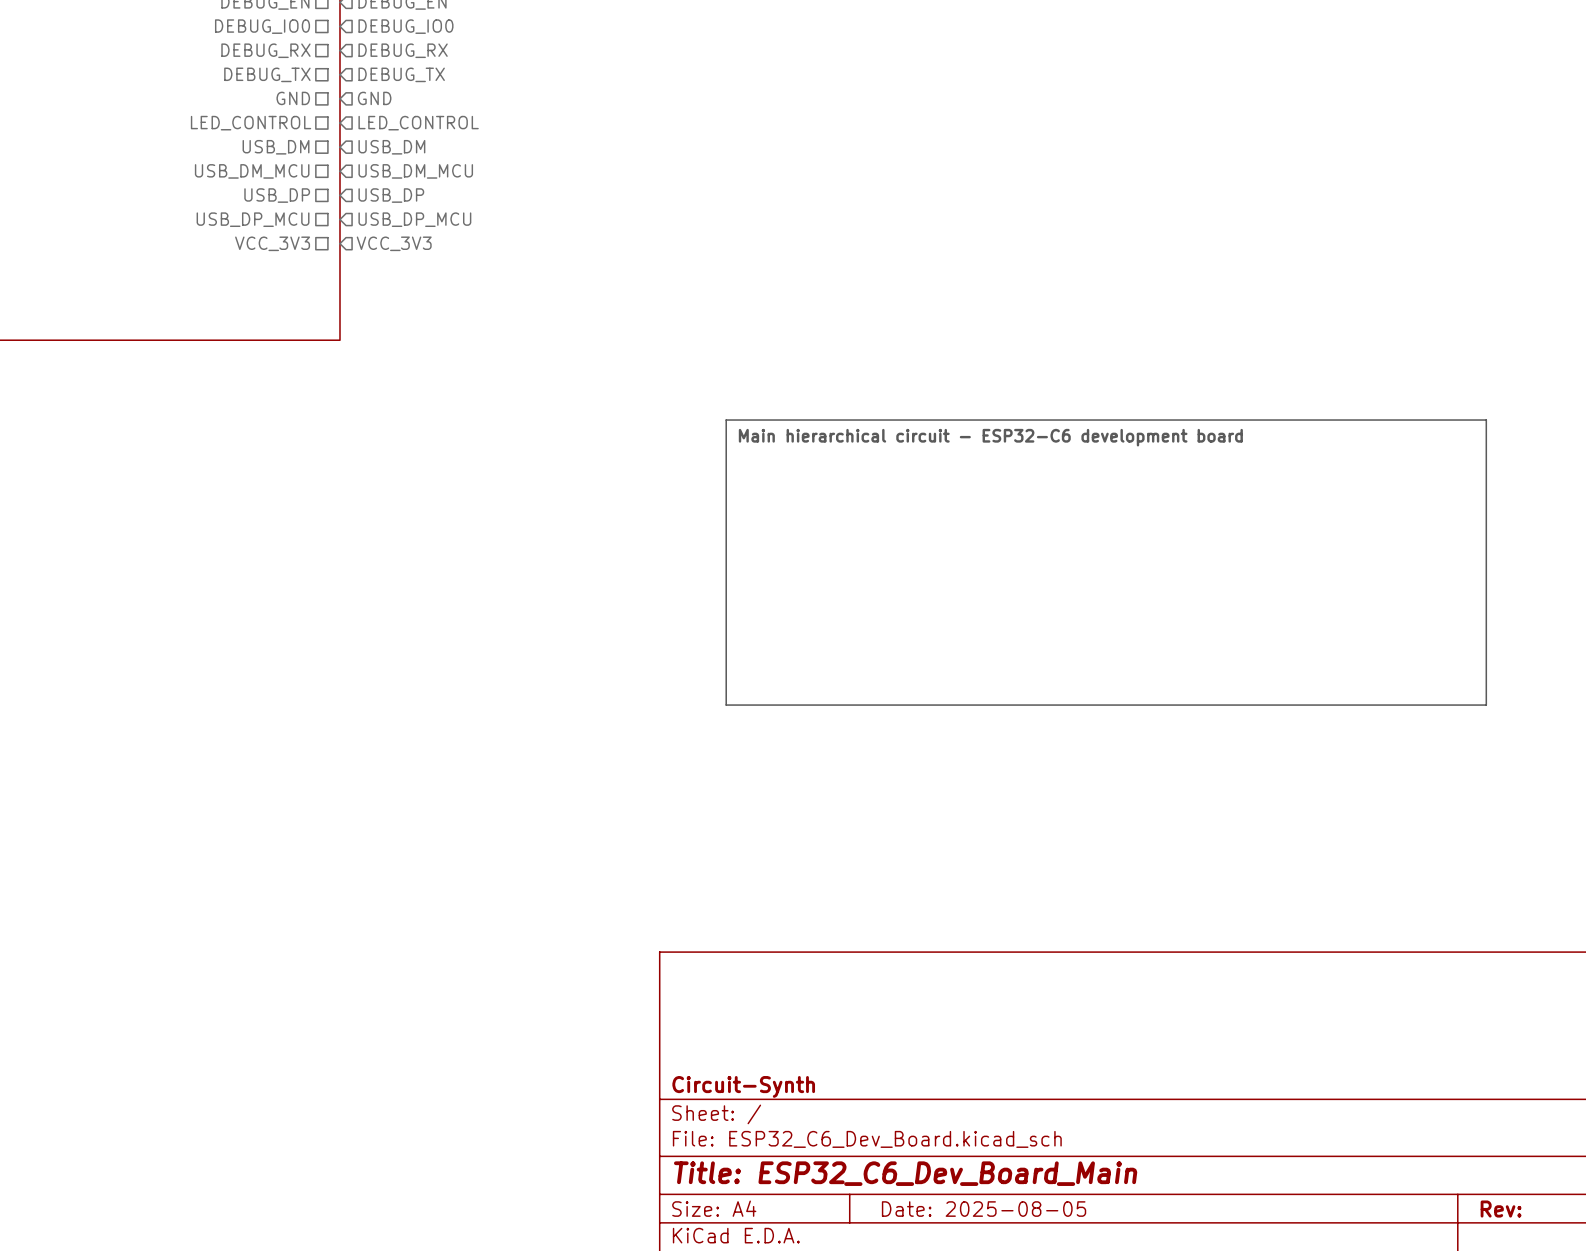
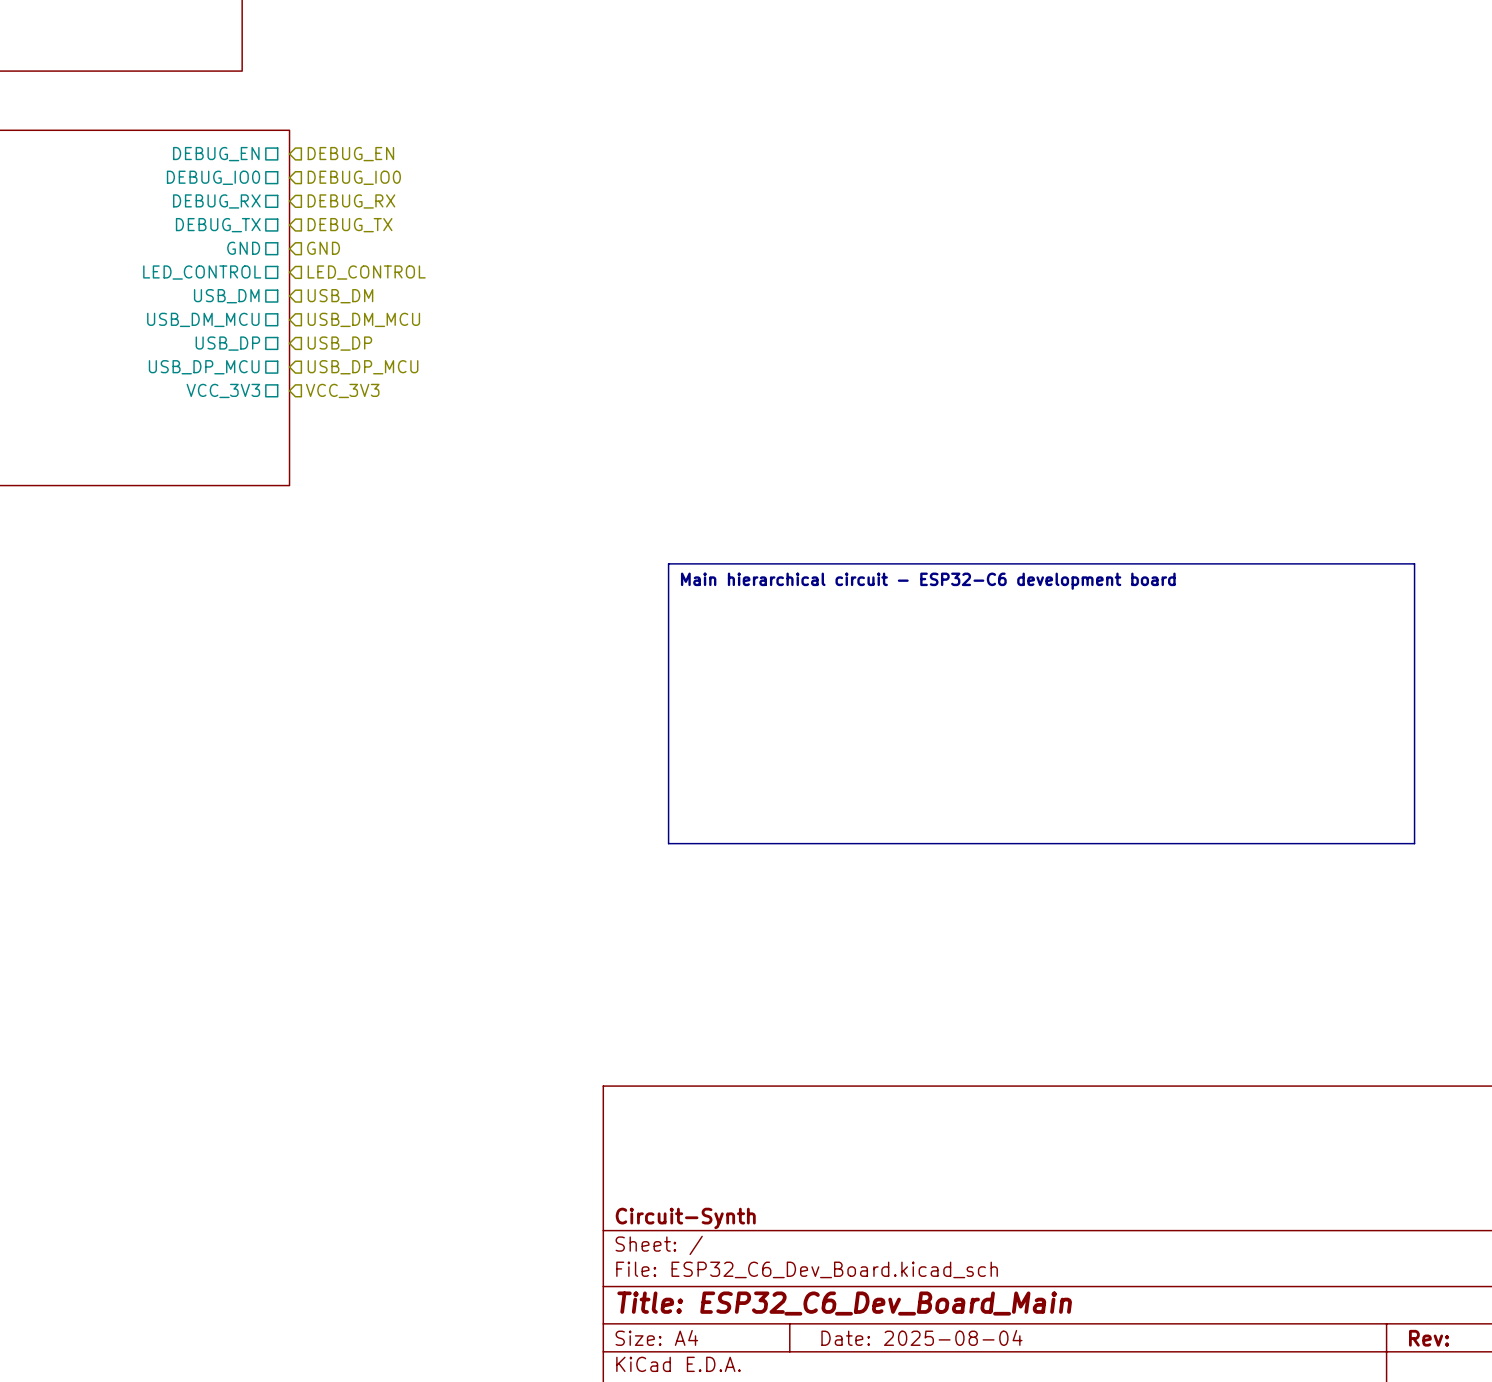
title block: Date: 2025-08-05 (984, 1209) -> Date: 2025-08-04 (921, 1337)

